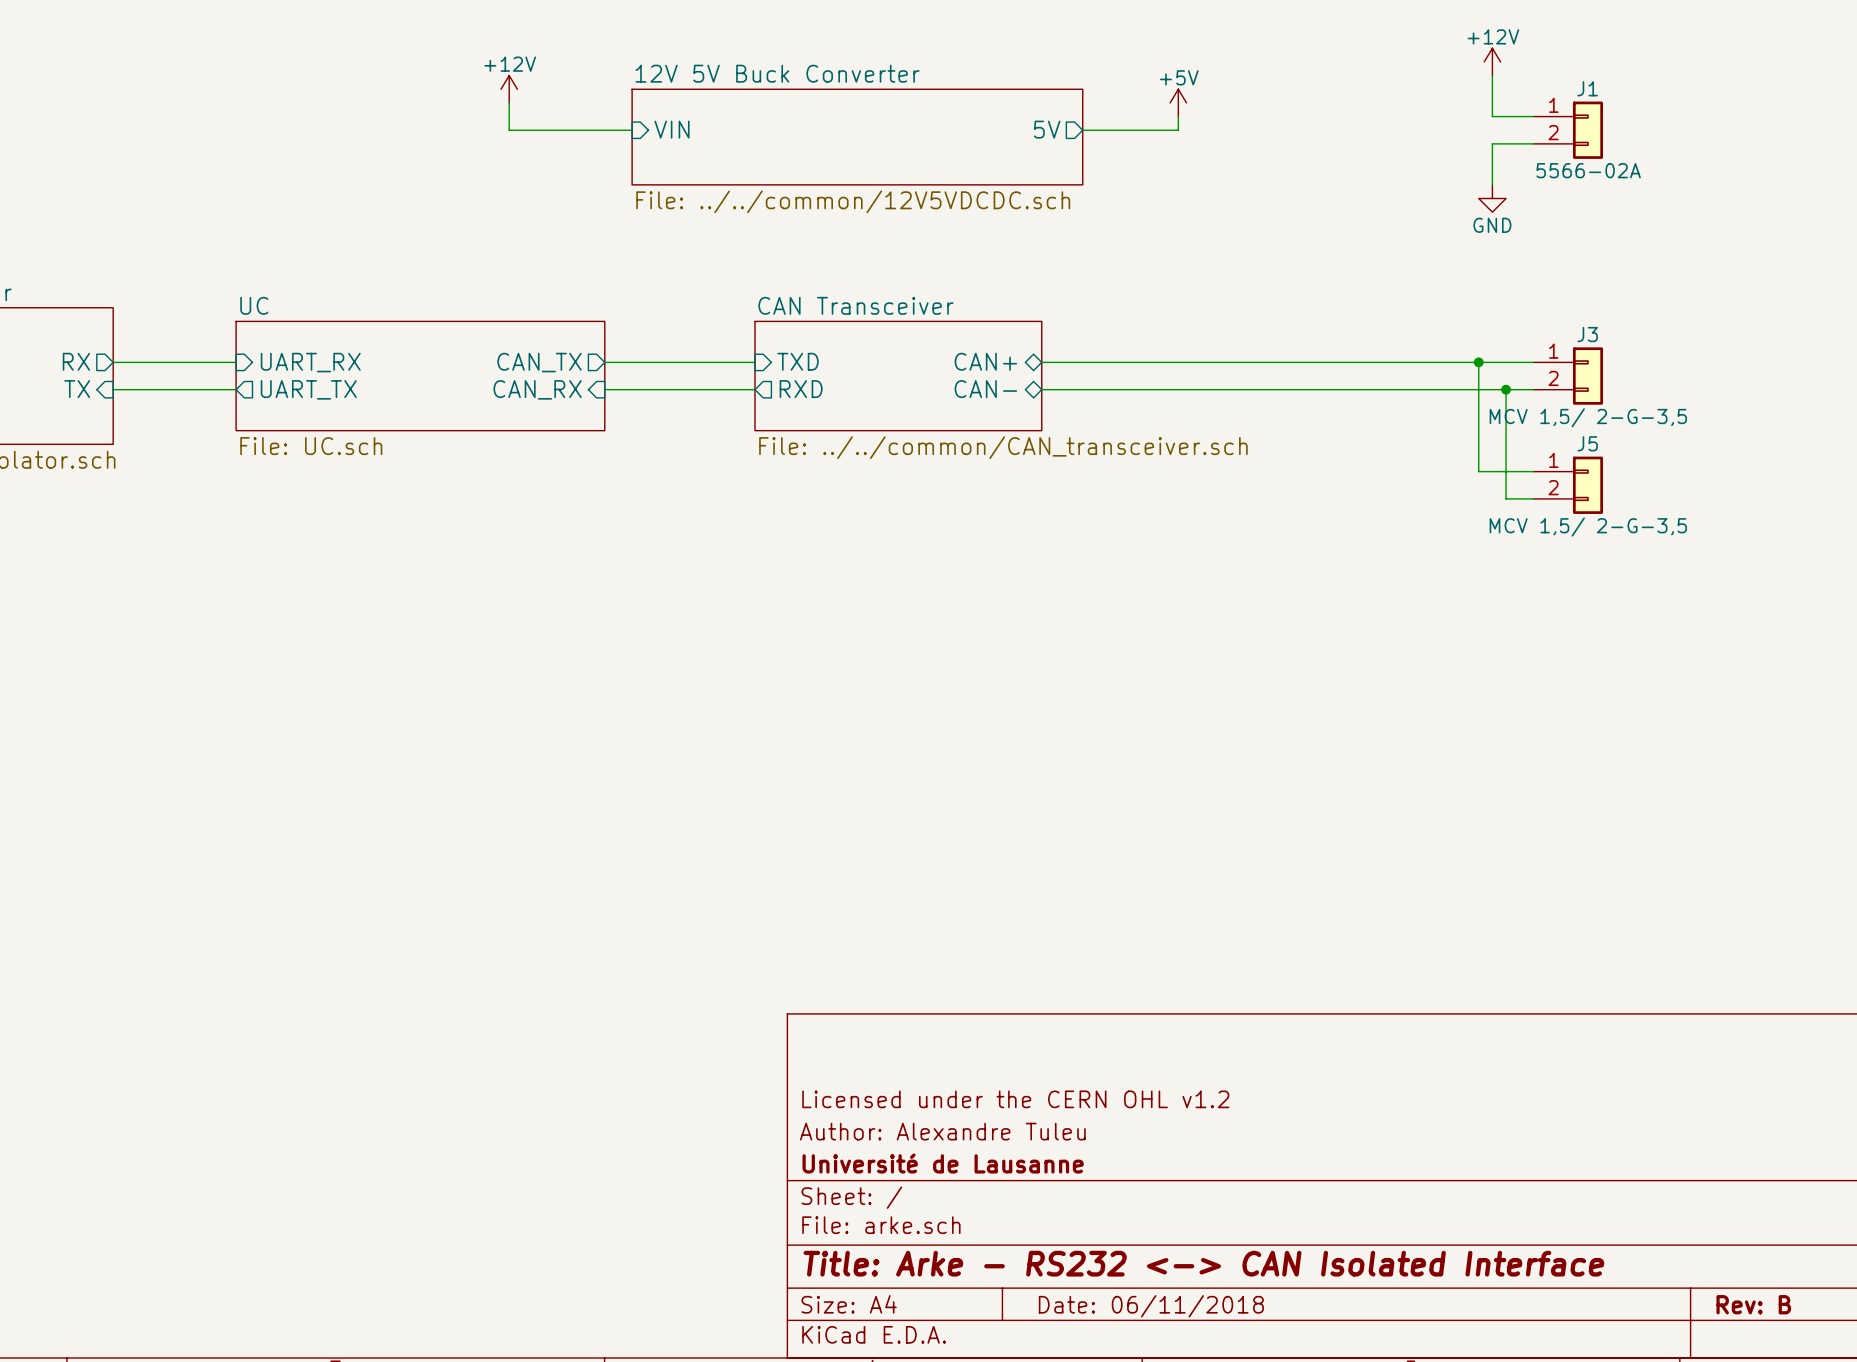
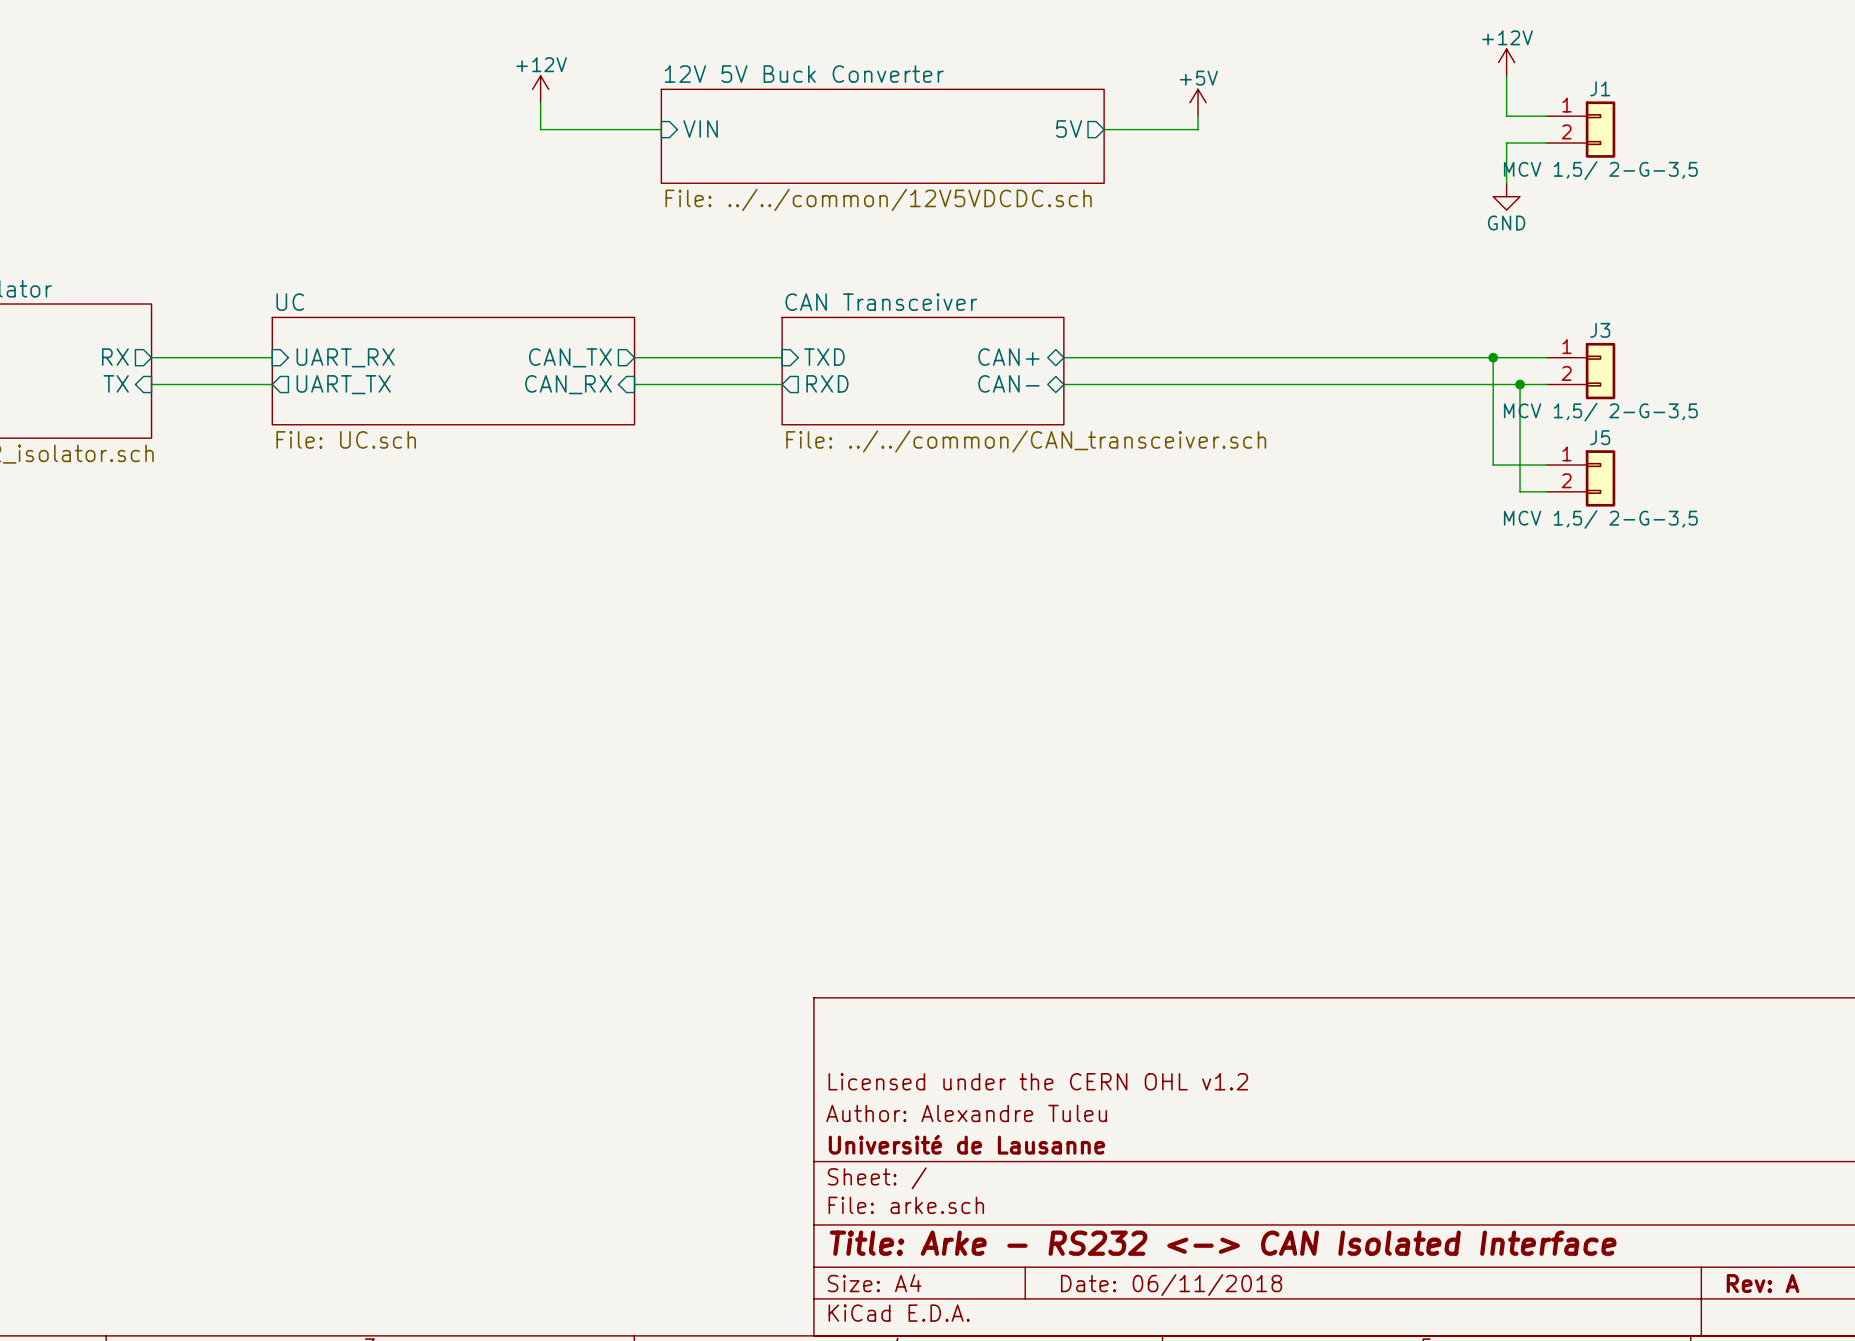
J1 value: 5566-02A (1588, 170) -> MCV 1,5/ 2-G-3,5 (1600, 170)
title block: Rev: B (1753, 1304) -> Rev: A (1763, 1283)

